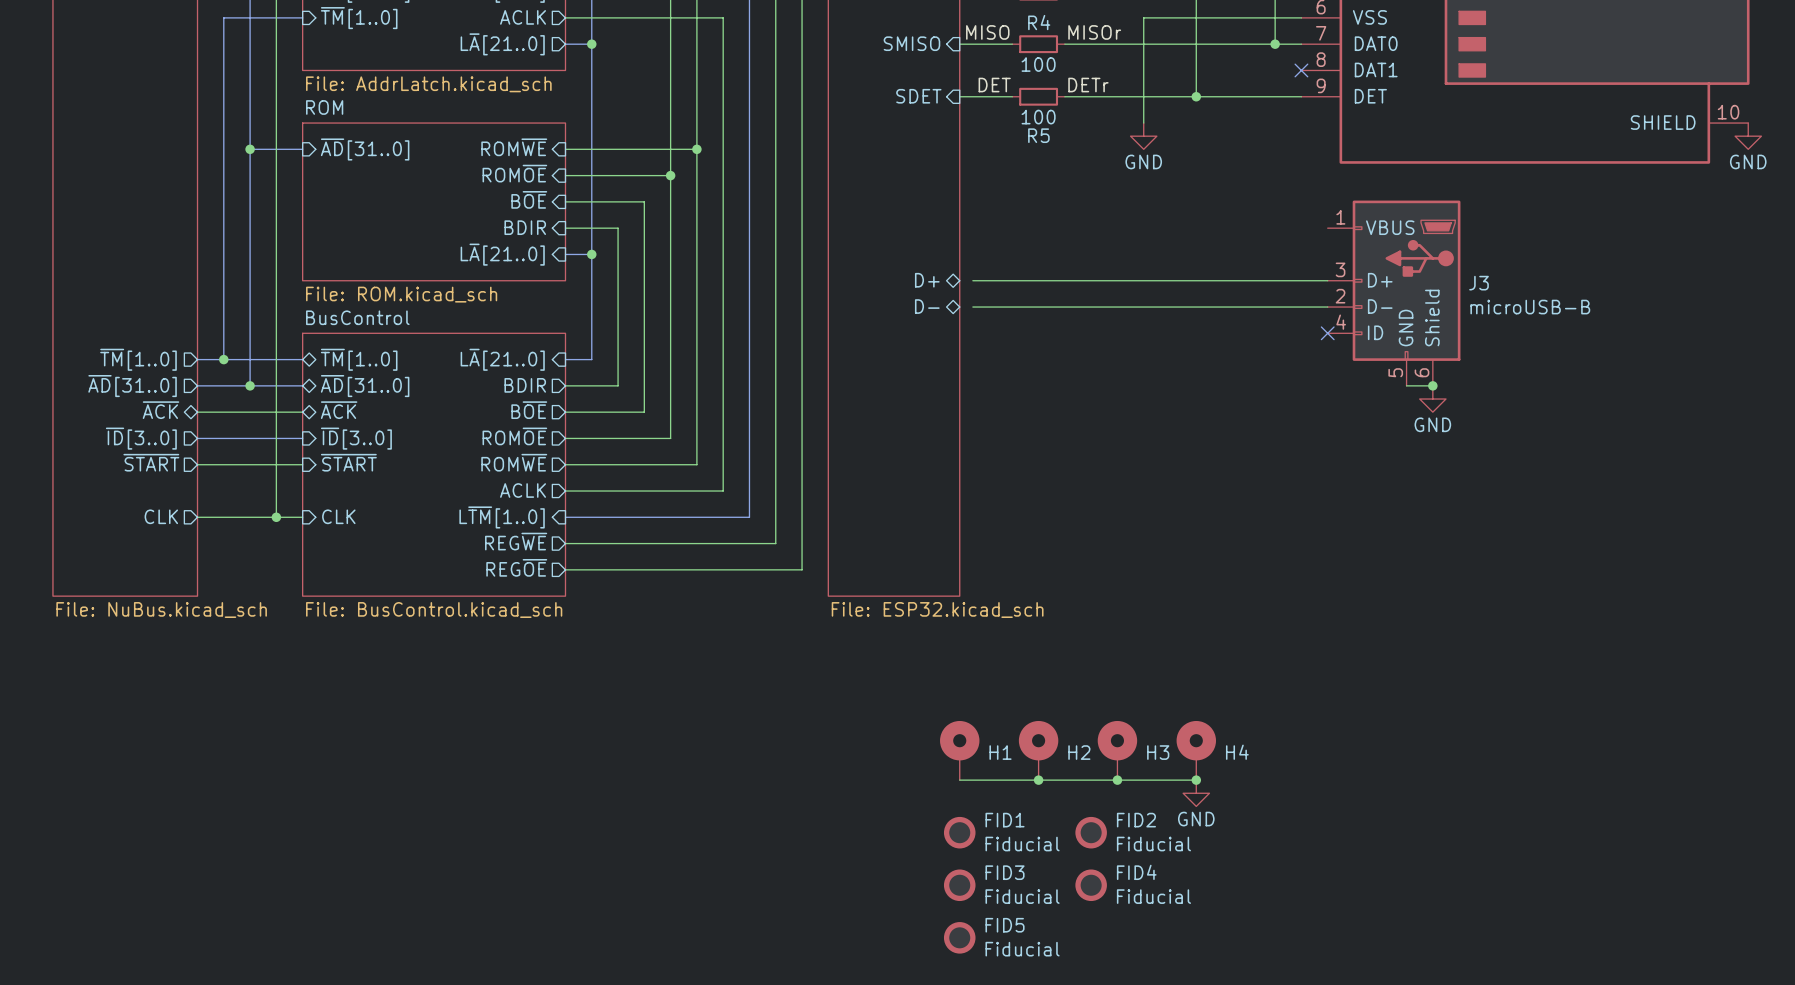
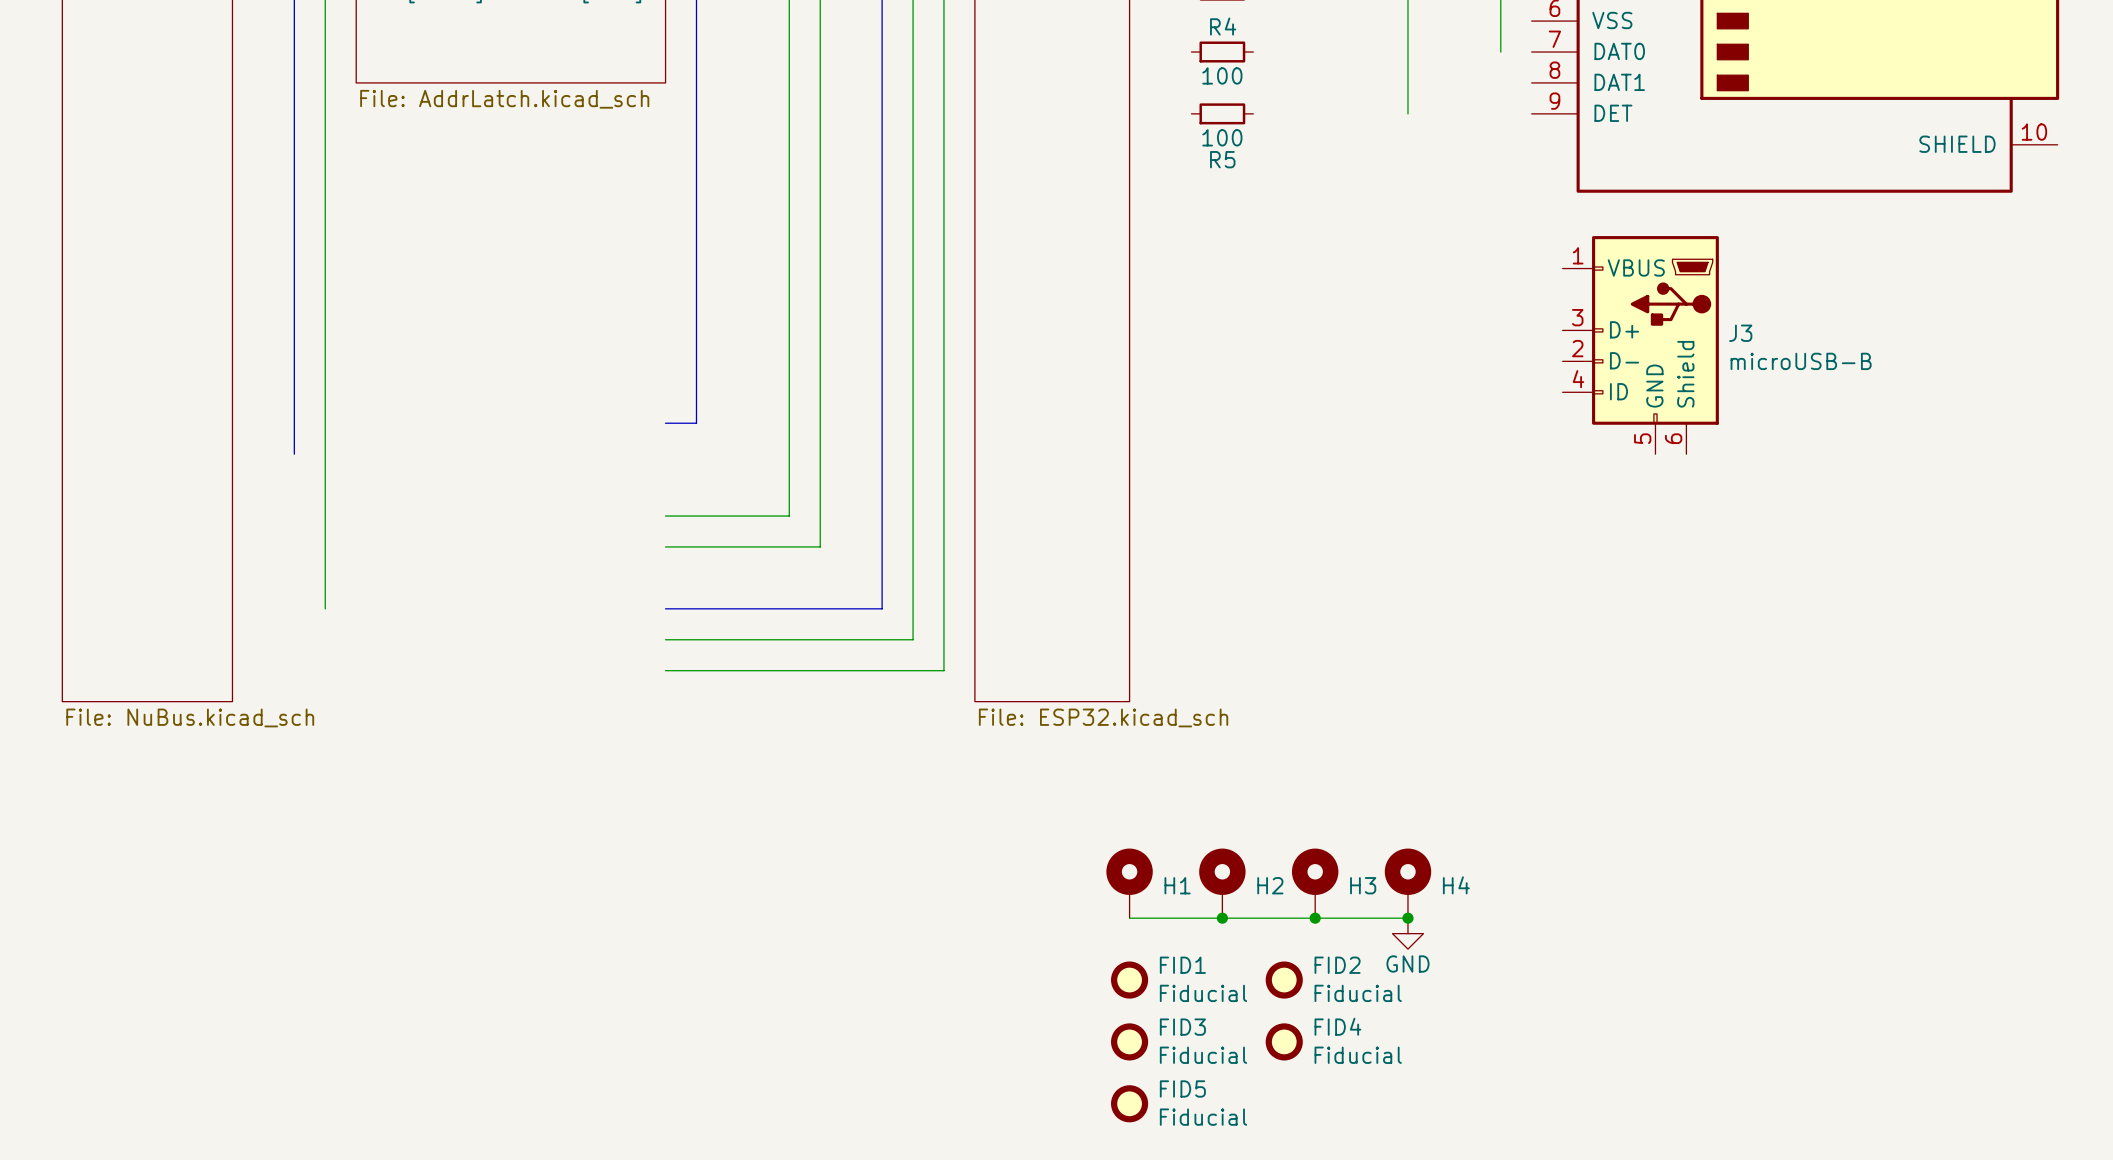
bus: (302, 17) (223, 17) (223, 359) -> none
sheet pin: ACLK (523, 17) -> none
wire: (565, 17) (723, 17) (723, 491) (565, 491) -> none
wire: (1301, 17) (1143, 17) (1143, 123) -> none
sheet pin: ~{TM}[1..0] (359, 18) -> none
label: MISO (987, 32) -> none
label: MISOr (1094, 32) -> none
sheet pin: SMISO (911, 43) -> none
sheet pin: L~{A}[21..0] (502, 44) -> none
bus: (565, 44) (591, 44) -> none
junction: (591, 44) -> none
wire: (959, 44) (1012, 44) -> none
wire: (1064, 44) (1301, 44) -> none
junction: (1275, 44) -> none
no-connect mark: (1301, 70) -> none
label: DET (994, 85) -> none
label: DETr (1088, 85) -> none
sheet pin: SDET (918, 96) -> none
wire: (959, 96) (1012, 96) -> none
wire: (1064, 96) (1301, 96) -> none
junction: (1196, 96) -> none
power symbol: GND (1143, 136) -> none
power symbol: GND (1748, 136) -> none
sheet pin: ROM~{WE} (514, 147) -> none
bus: (250, 149) (302, 149) -> none
junction: (250, 149) -> none
sheet pin: ~{AD}[31..0] (365, 149) -> none
wire: (565, 149) (696, 149) -> none
junction: (696, 149) -> none
sheet pin: ROM~{OE} (514, 173) -> none
wire: (565, 175) (670, 175) -> none
junction: (670, 175) -> none
sheet pin: B~{OE} (529, 199) -> none
sheet ROM: File: ROM.kicad_sch (434, 201) -> none
wire: (565, 201) (644, 201) (644, 412) (565, 412) -> none
sheet pin: BDIR (525, 227) -> none
wire: (565, 228) (618, 228) (618, 385) (565, 385) -> none
sheet pin: L~{A}[21..0] (502, 254) -> none
bus: (565, 254) (591, 254) -> none
junction: (591, 254) -> none
sheet pin: D+ (927, 280) -> none
wire: (972, 280) (1327, 280) -> none
sheet pin: D- (927, 306) -> none
wire: (972, 307) (1327, 307) -> none
no-connect mark: (1327, 333) -> none
sheet pin: ~{TM}[1..0] (138, 359) -> none
bus: (197, 359) (302, 359) -> none
junction: (223, 359) -> none
sheet pin: ~{TM}[1..0] (359, 359) -> none
sheet pin: L~{A}[21..0] (502, 359) -> none
bus: (197, 385) (302, 385) -> none
junction: (250, 385) -> none
sheet pin: BDIR (525, 385) -> none
wire: (1406, 385) (1432, 385) -> none
junction: (1432, 385) -> none
sheet pin: ~{AD}[31..0] (132, 386) -> none
sheet pin: ~{AD}[31..0] (365, 386) -> none
power symbol: GND (1432, 399) -> none
sheet pin: ~{ACK} (160, 410) -> none
sheet pin: ~{ACK} (339, 410) -> none
sheet pin: B~{OE} (529, 410) -> none
wire: (197, 412) (302, 412) -> none
sheet pin: ROM~{OE} (514, 436) -> none
sheet pin: ~{ID}[3..0] (141, 438) -> none
bus: (197, 438) (302, 438) -> none
sheet pin: ~{ID}[3..0] (356, 438) -> none
sheet pin: ~{START} (151, 462) -> none
sheet pin: ~{START} (348, 462) -> none
sheet pin: ROM~{WE} (514, 462) -> none
wire: (197, 464) (302, 464) -> none
sheet BusControl: File: BusControl.kicad_sch (434, 464) -> none
sheet pin: ACLK (523, 490) -> none
sheet pin: CLK (161, 516) -> none
sheet pin: CLK (338, 516) -> none
wire: (197, 517) (302, 517) -> none
junction: (276, 517) -> none
sheet pin: L~{TM}[1..0] (502, 517) -> none
sheet pin: REG~{WE} (516, 541) -> none
sheet pin: REG~{OE} (516, 567) -> none

